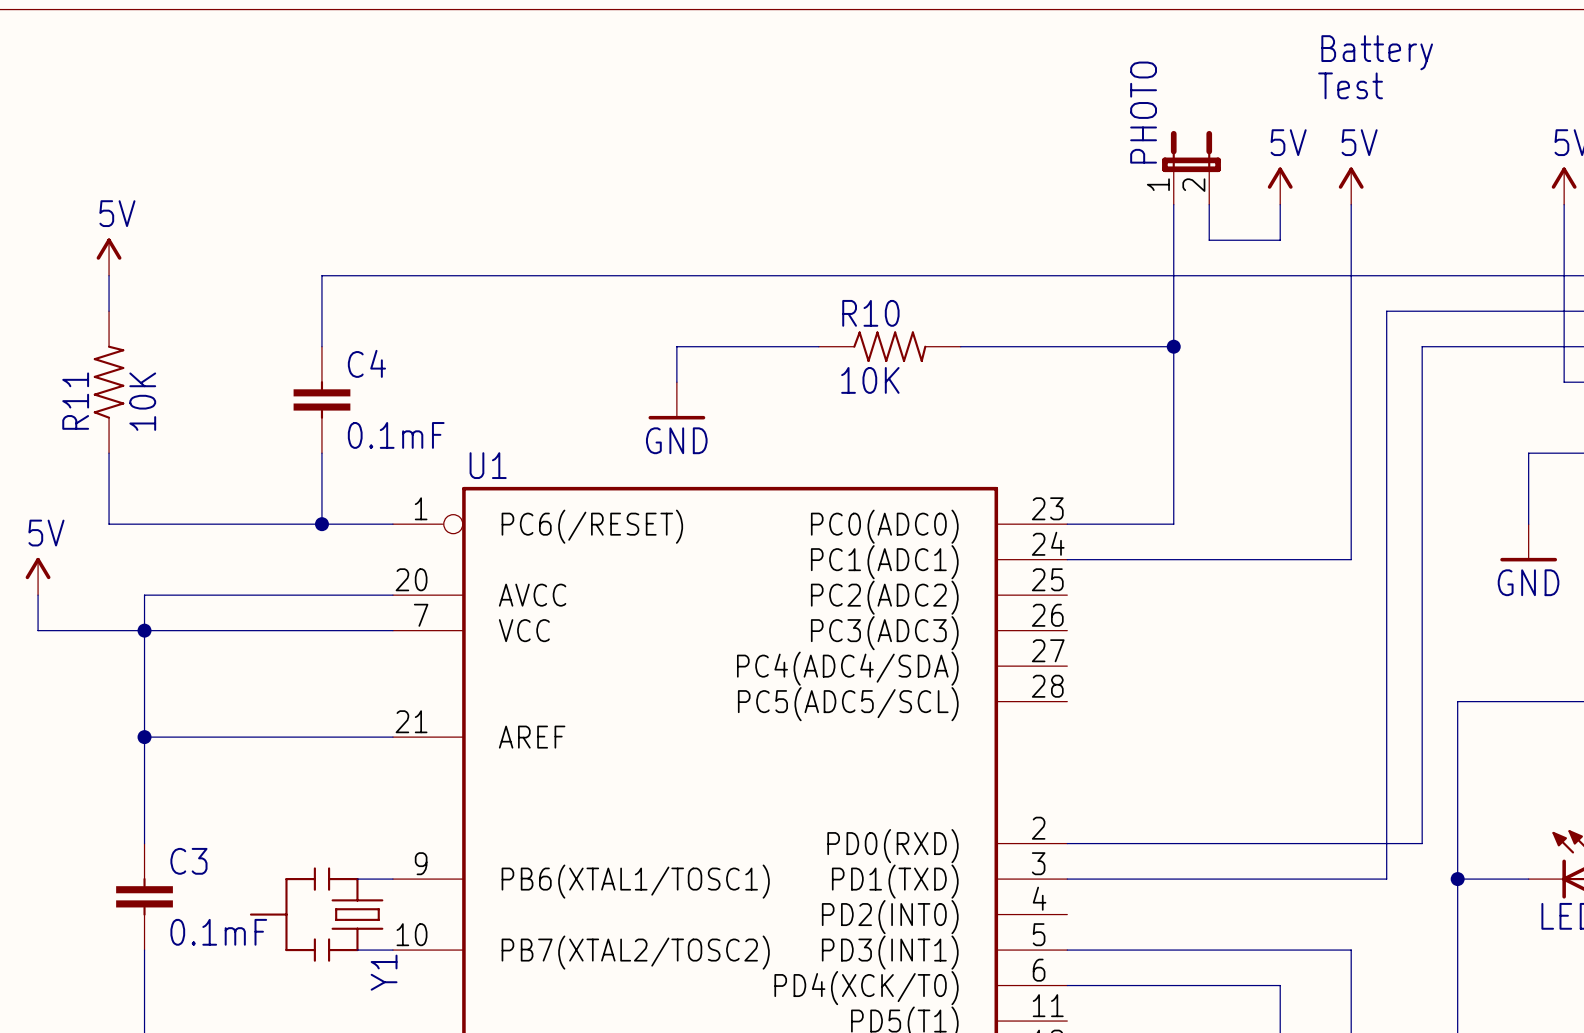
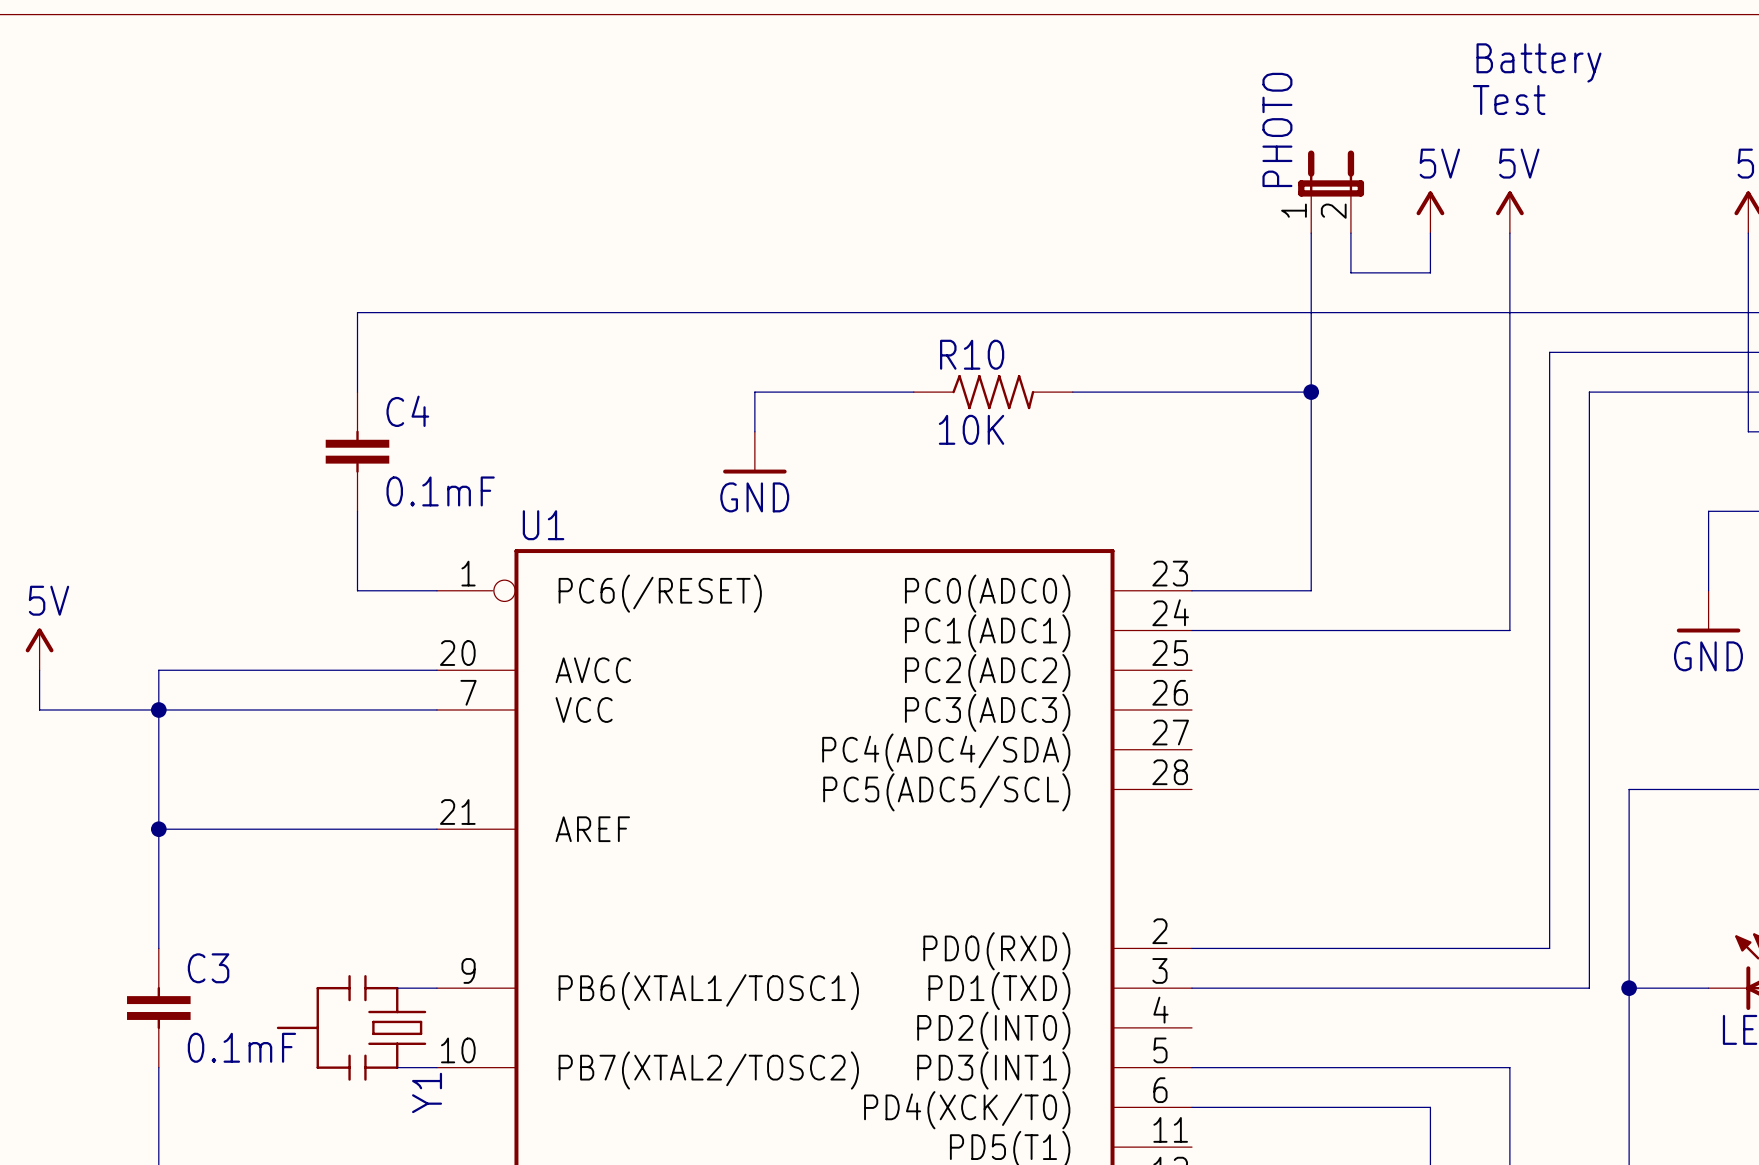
power symbol: 5V (109, 257) -> none
wire: (109, 275) (109, 311) -> none
R11: 10K (109, 382) -> none
wire: (109, 453) (109, 524) (321, 524) -> none
junction: (321, 524) -> none
wire: (1422, 843) (1386, 843) (1386, 879) -> (1589, 948) (1589, 988) (1549, 988)

